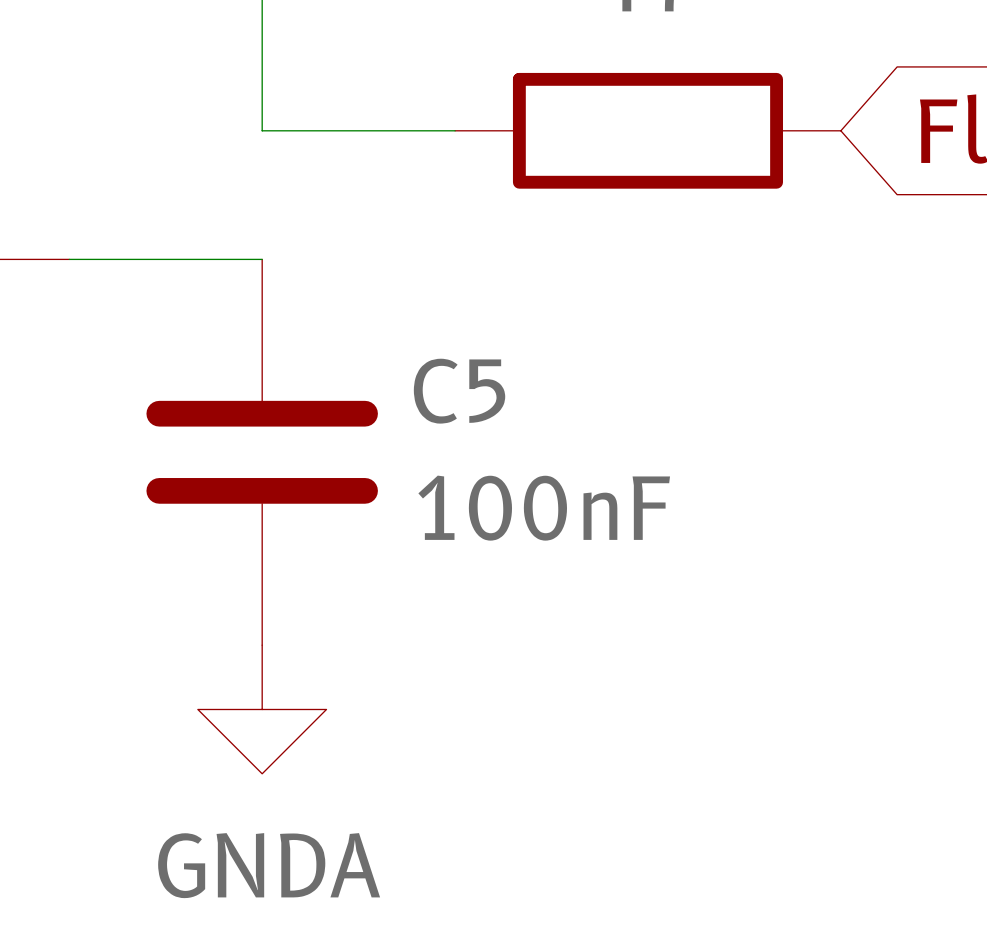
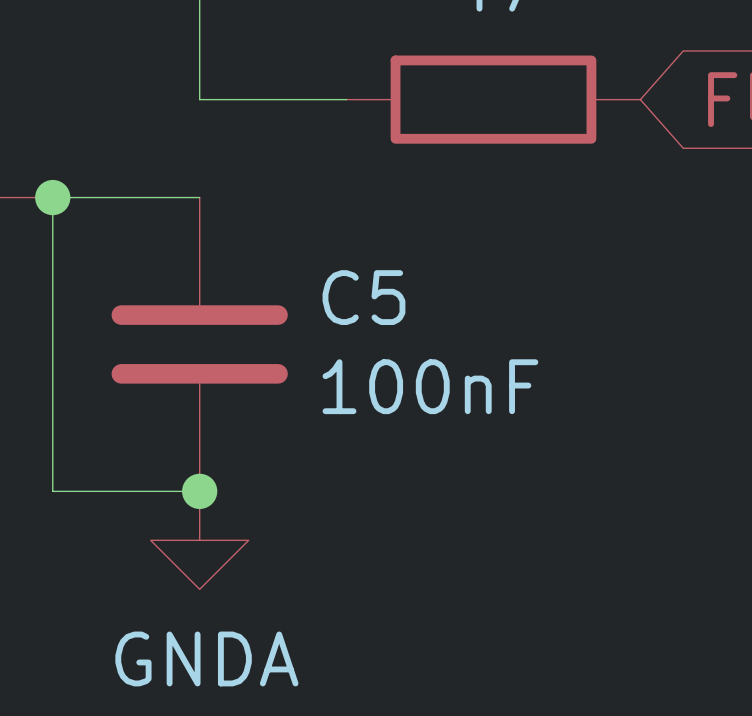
wire: none -> (52, 197) (52, 491) (199, 491)
junction: none -> (52, 197)
junction: none -> (199, 491)

